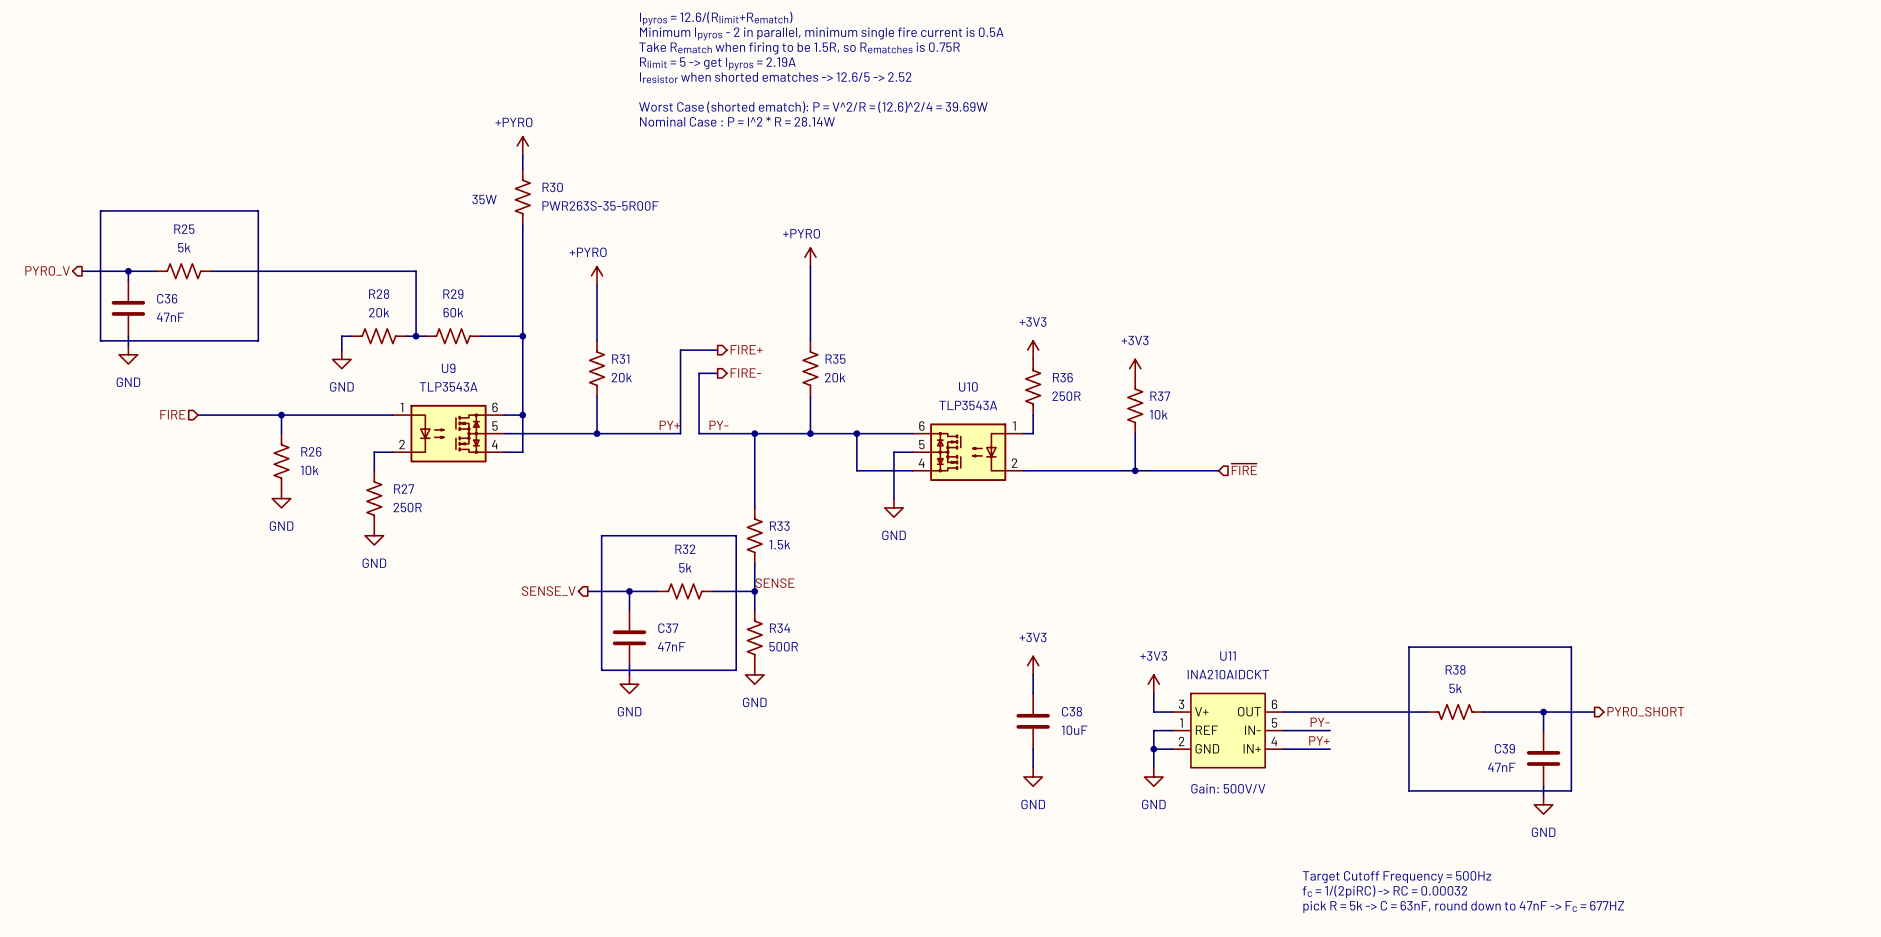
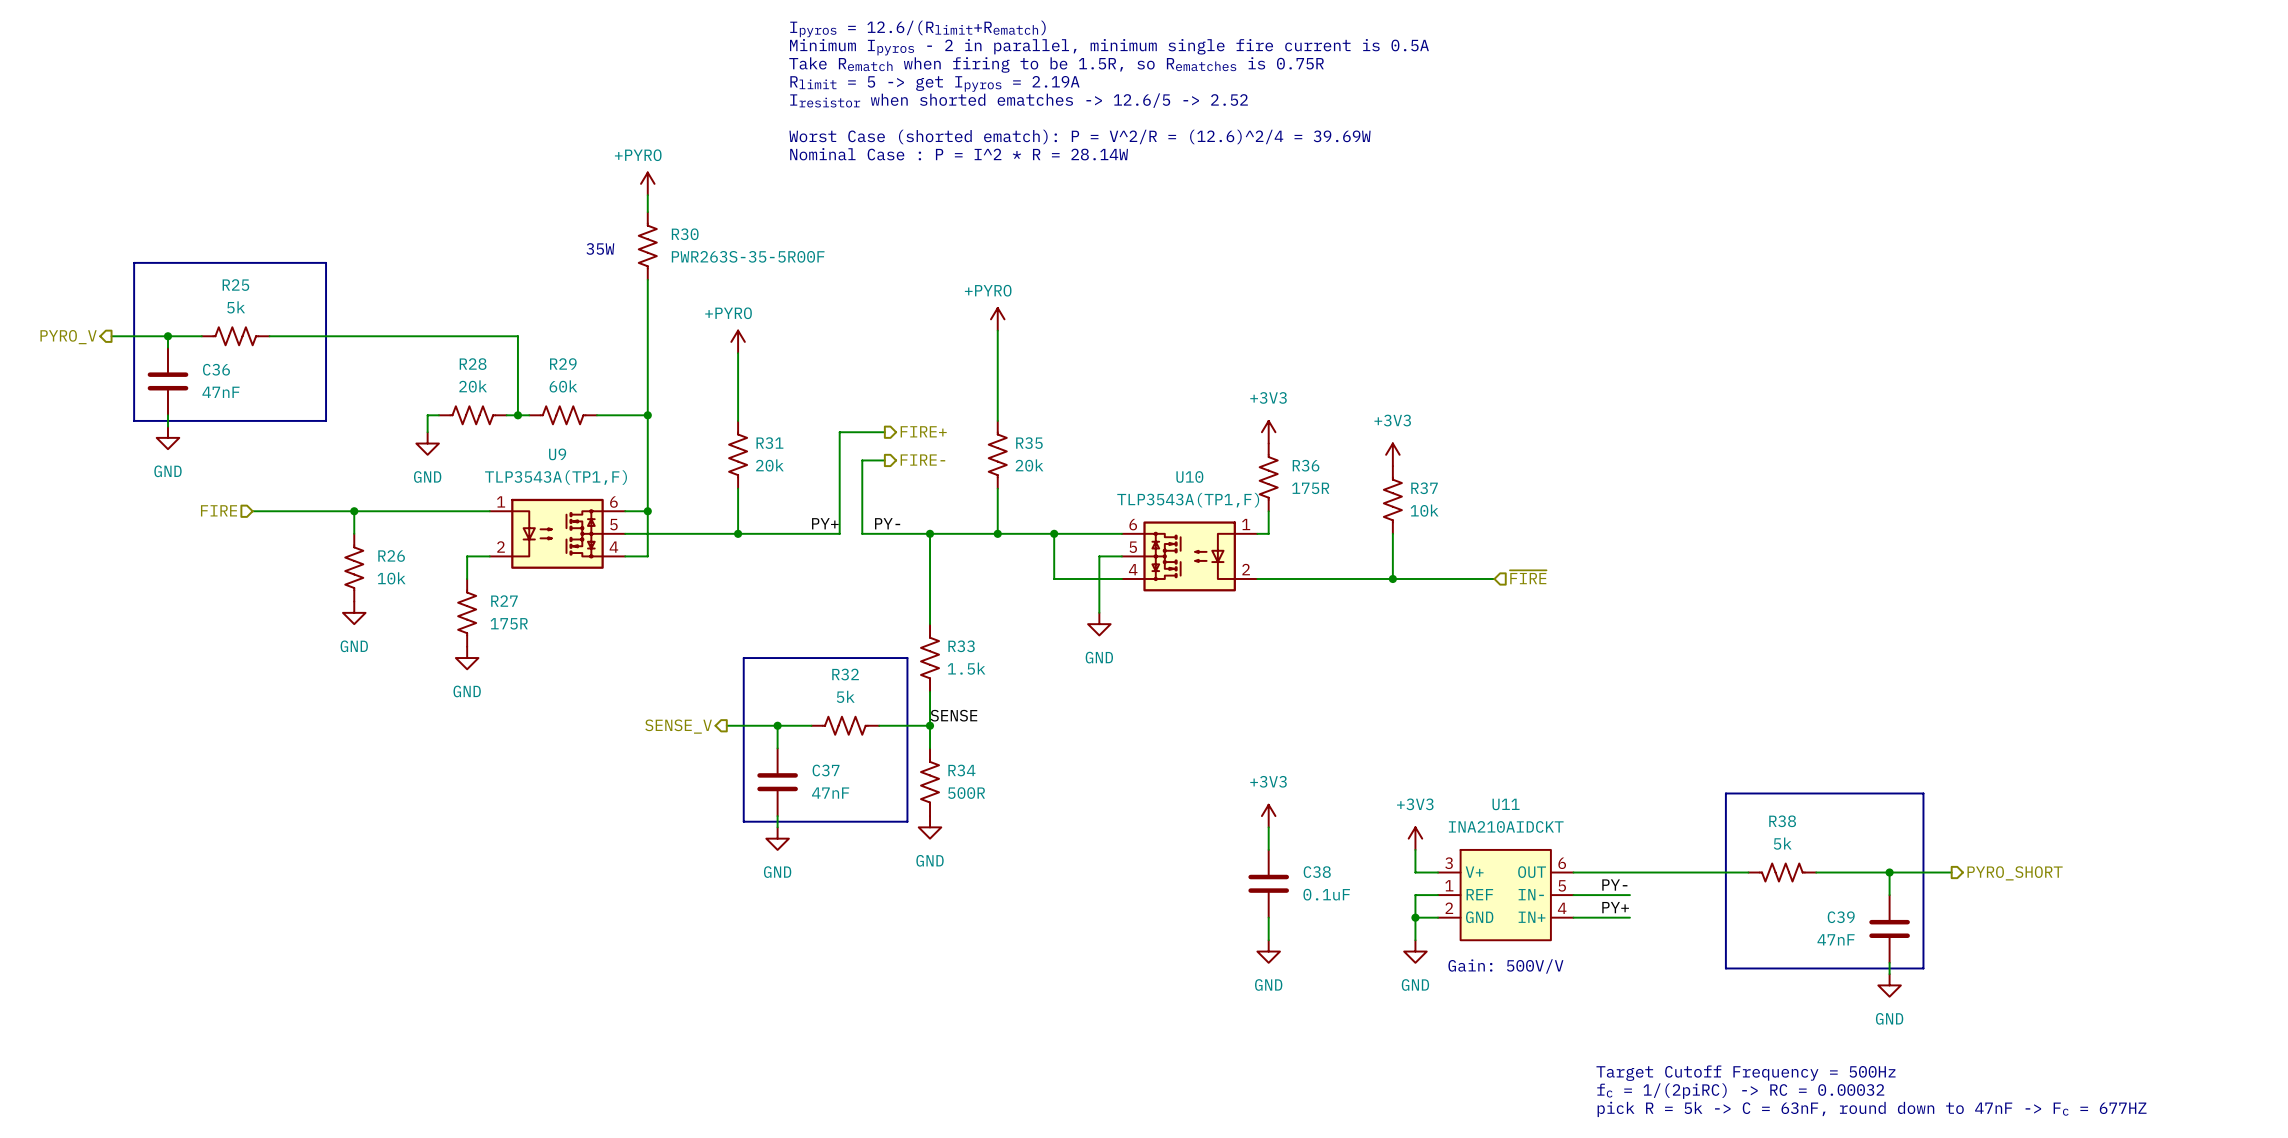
U9 value: TLP3543A (448, 386) -> TLP3543A(TP1,F) (556, 477)
R36 value: 250R (1066, 396) -> 175R (1310, 488)
U10 value: TLP3543A (968, 405) -> TLP3543A(TP1,F) (1188, 500)
R27 value: 250R (407, 507) -> 175R (509, 623)
C38 value: 10uF (1074, 730) -> 0.1uF (1326, 894)

